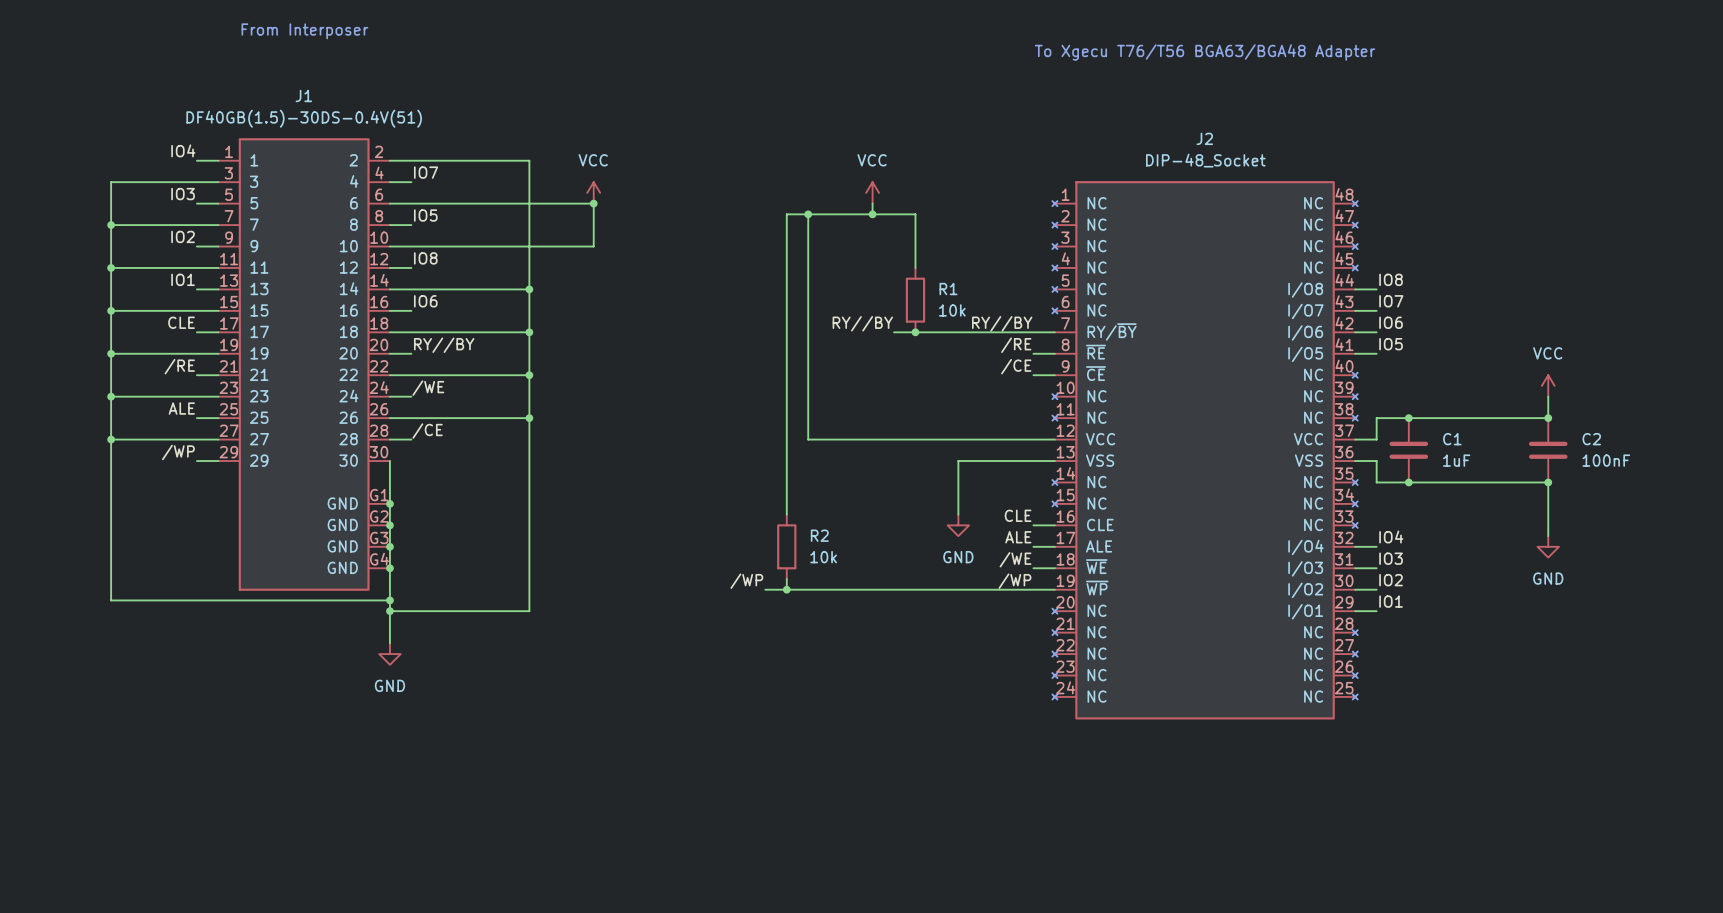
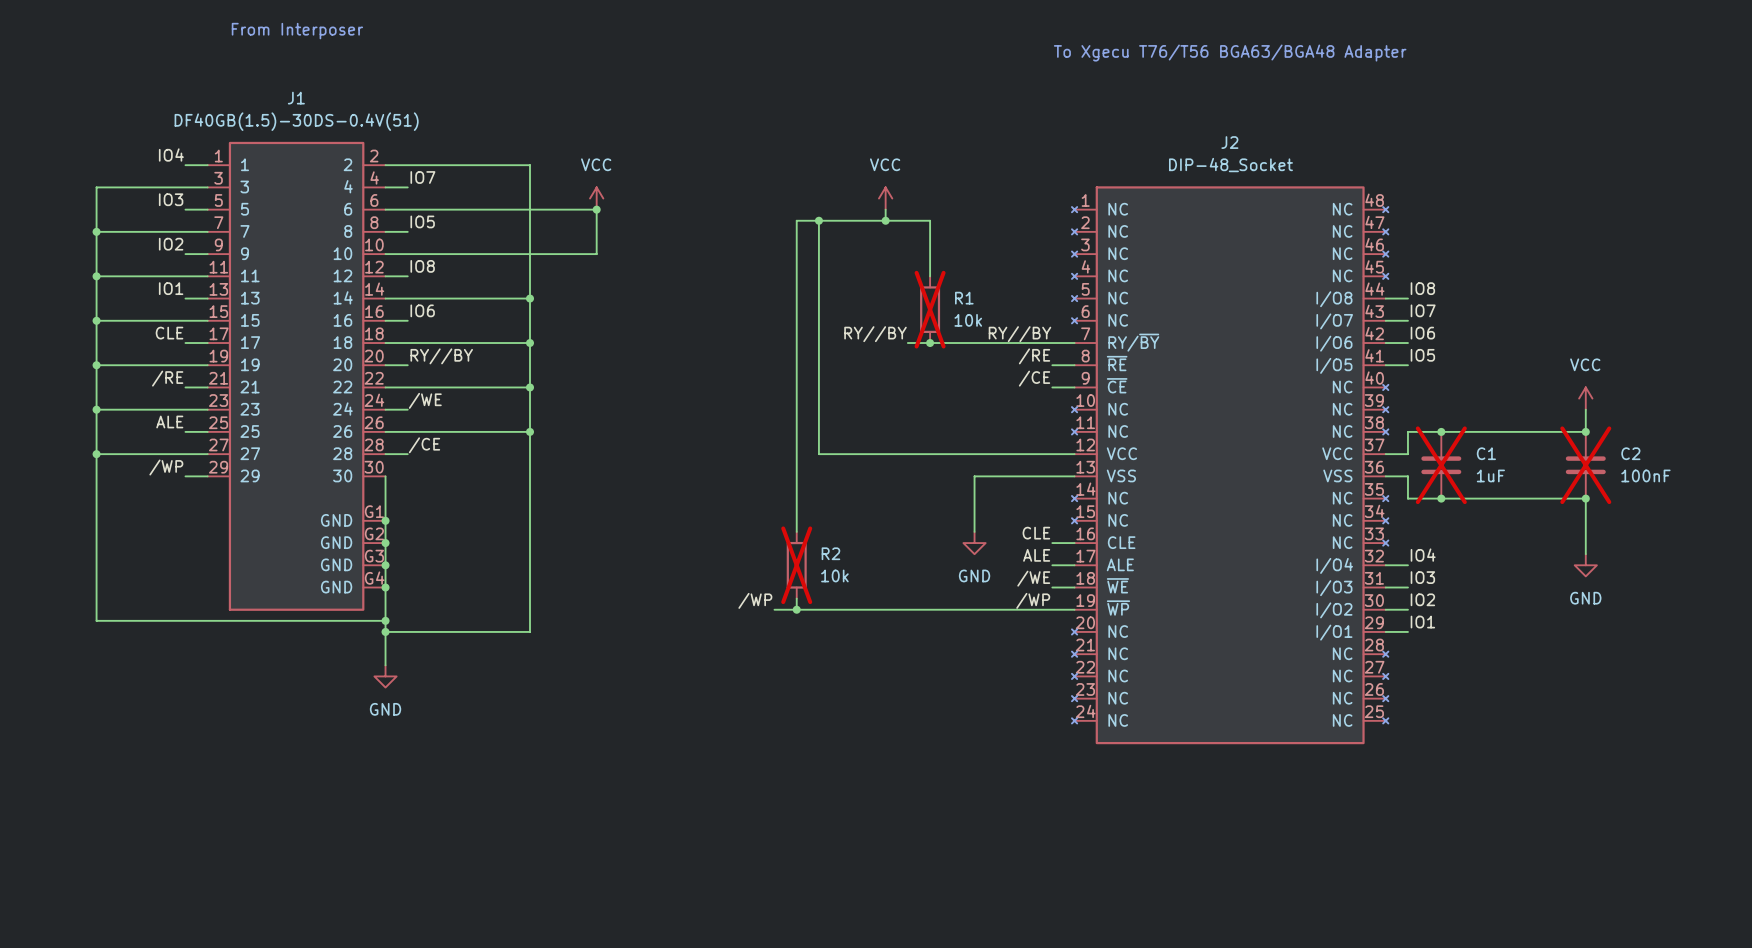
R1 do-not-place cross: none -> (930, 309)
C1 do-not-place cross: none -> (1441, 465)
C2 do-not-place cross: none -> (1585, 465)
R2 do-not-place cross: none -> (796, 565)

